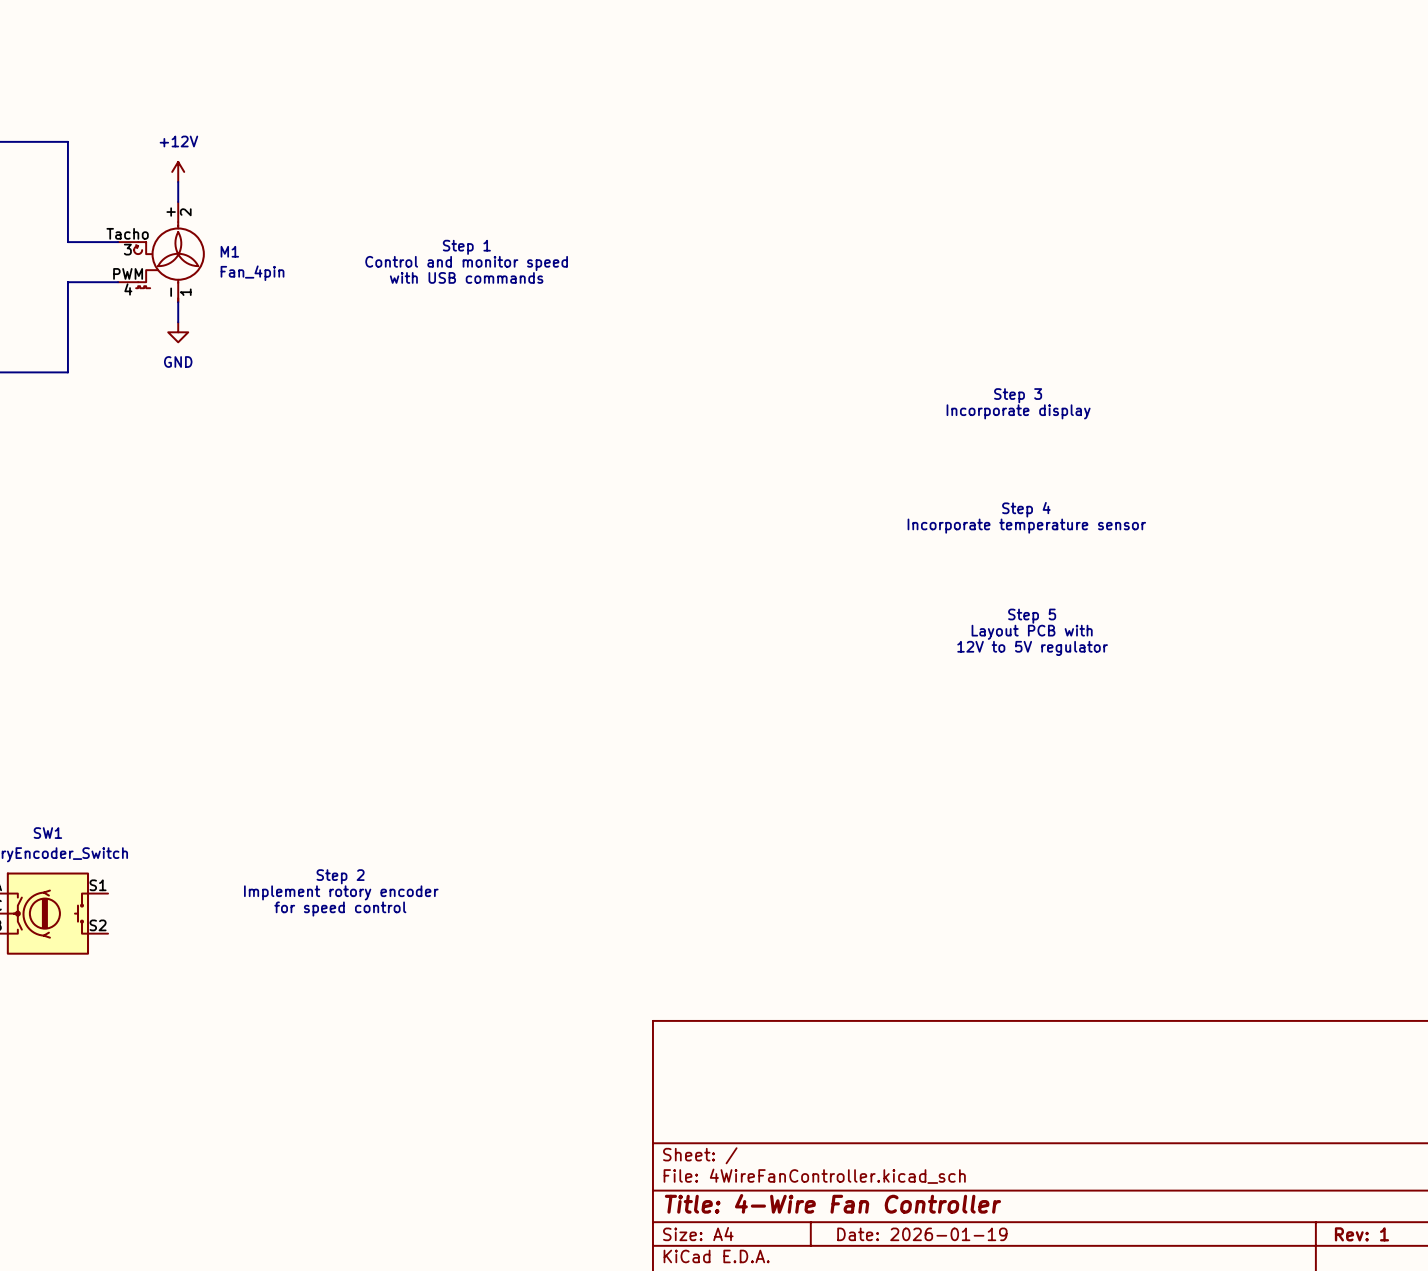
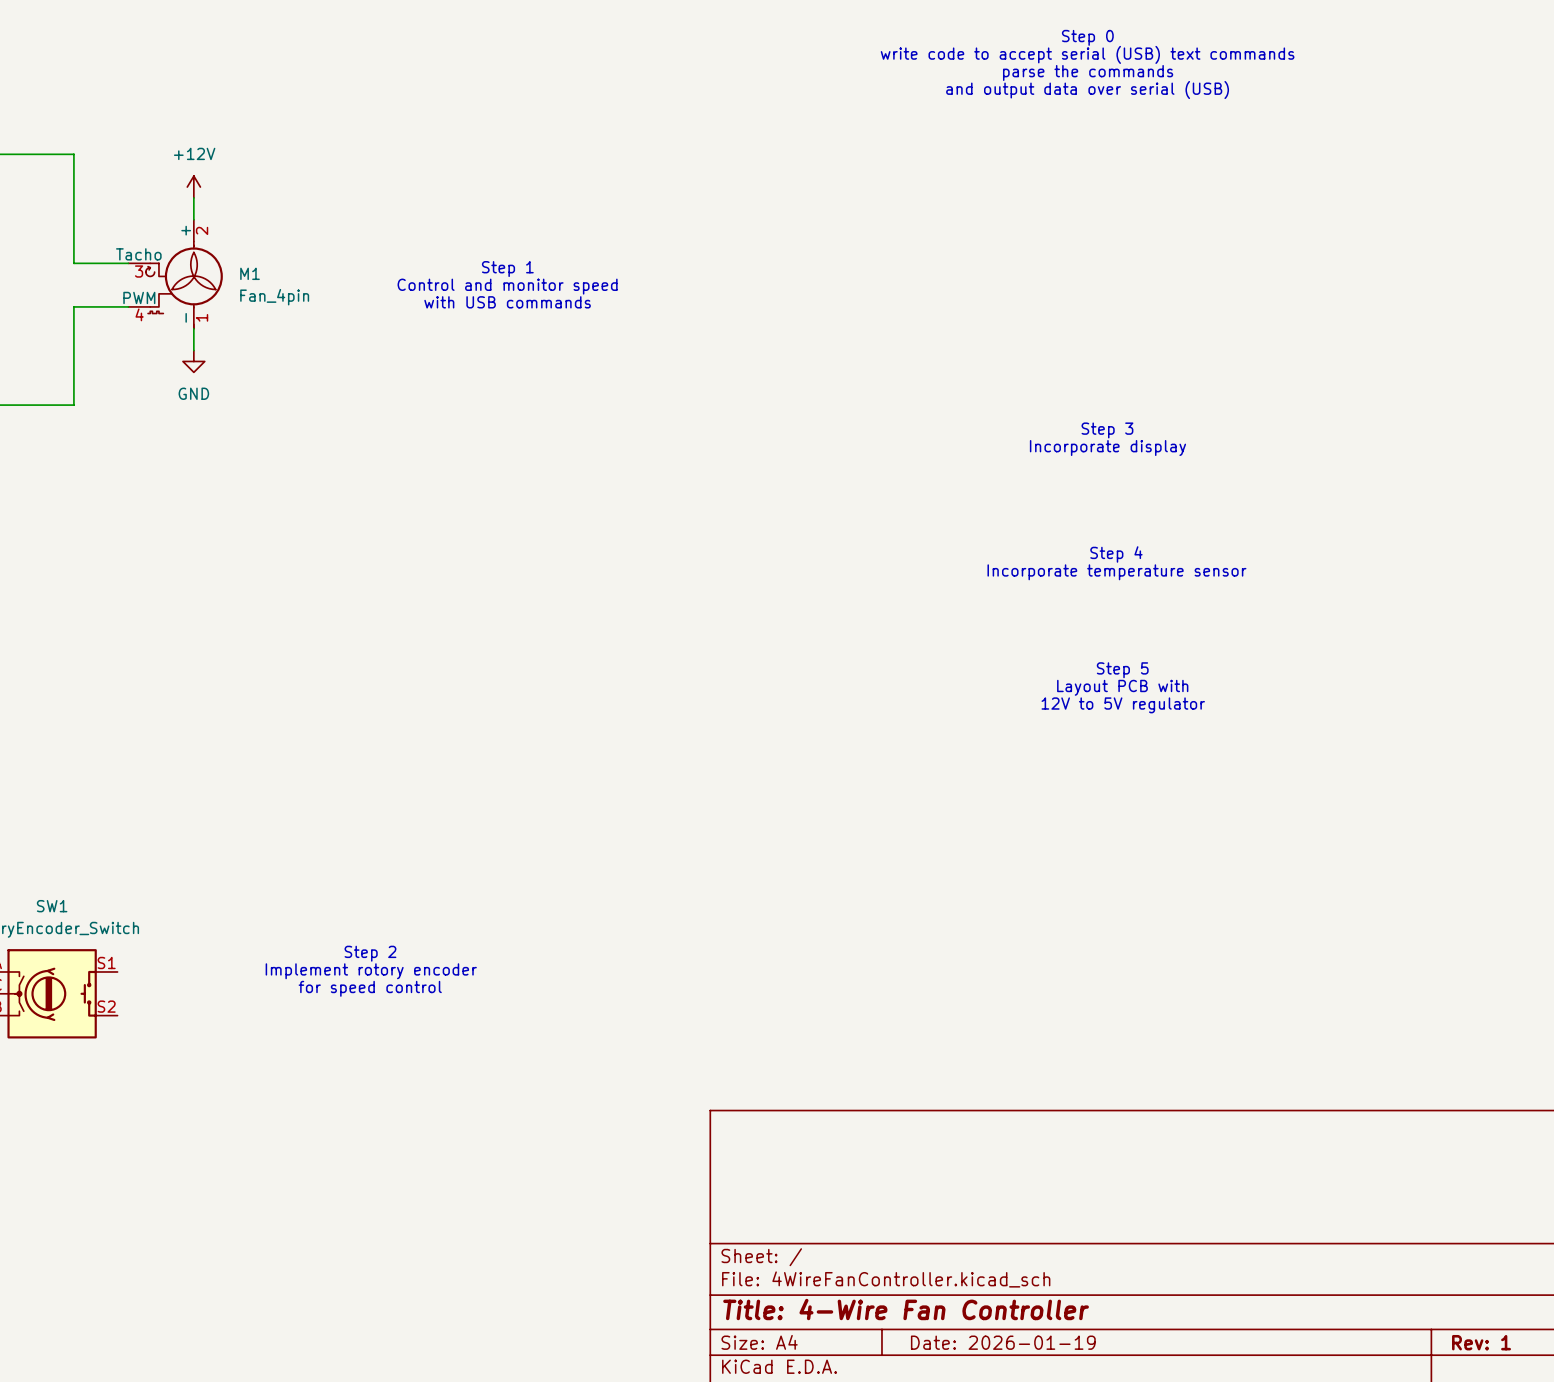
text: none -> Step 0 (1087, 37)
text: none -> write code to accept serial (USB) text commands (1087, 54)
text: none -> parse the commands (1088, 72)
text: none -> and output data over serial (USB) (1087, 90)

